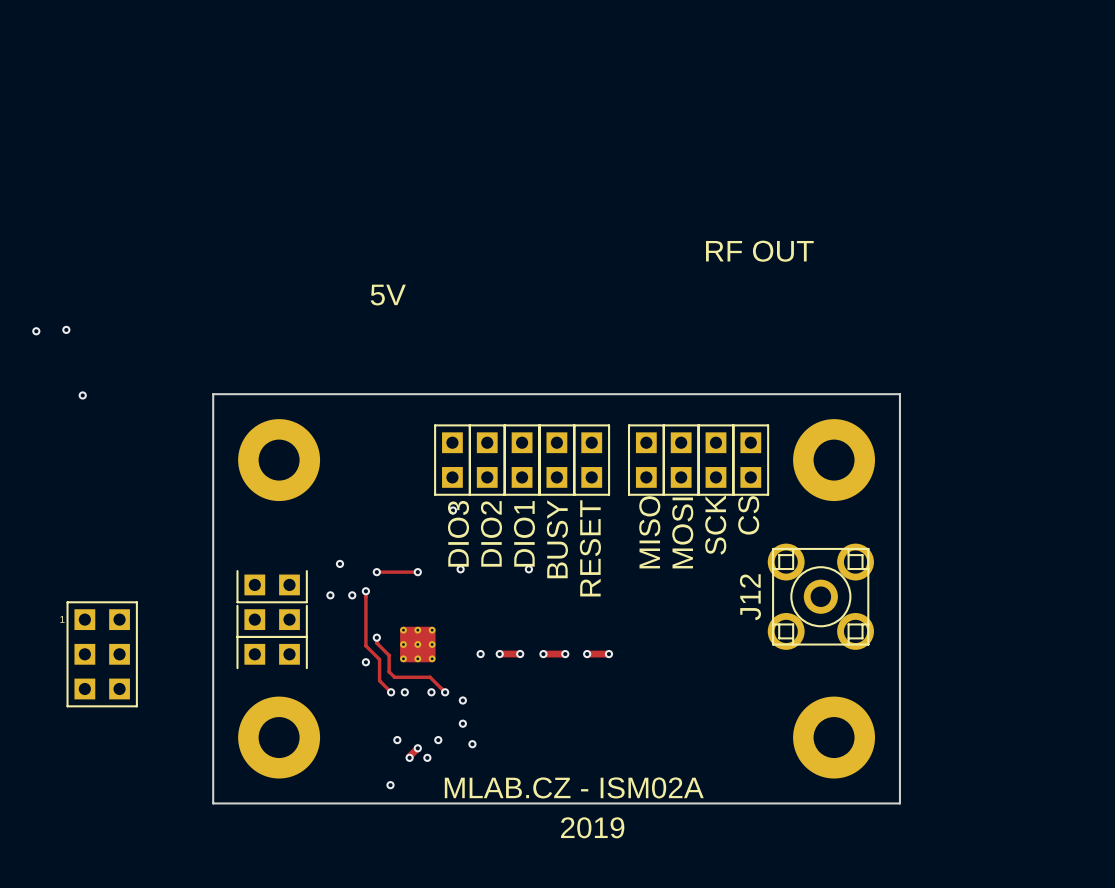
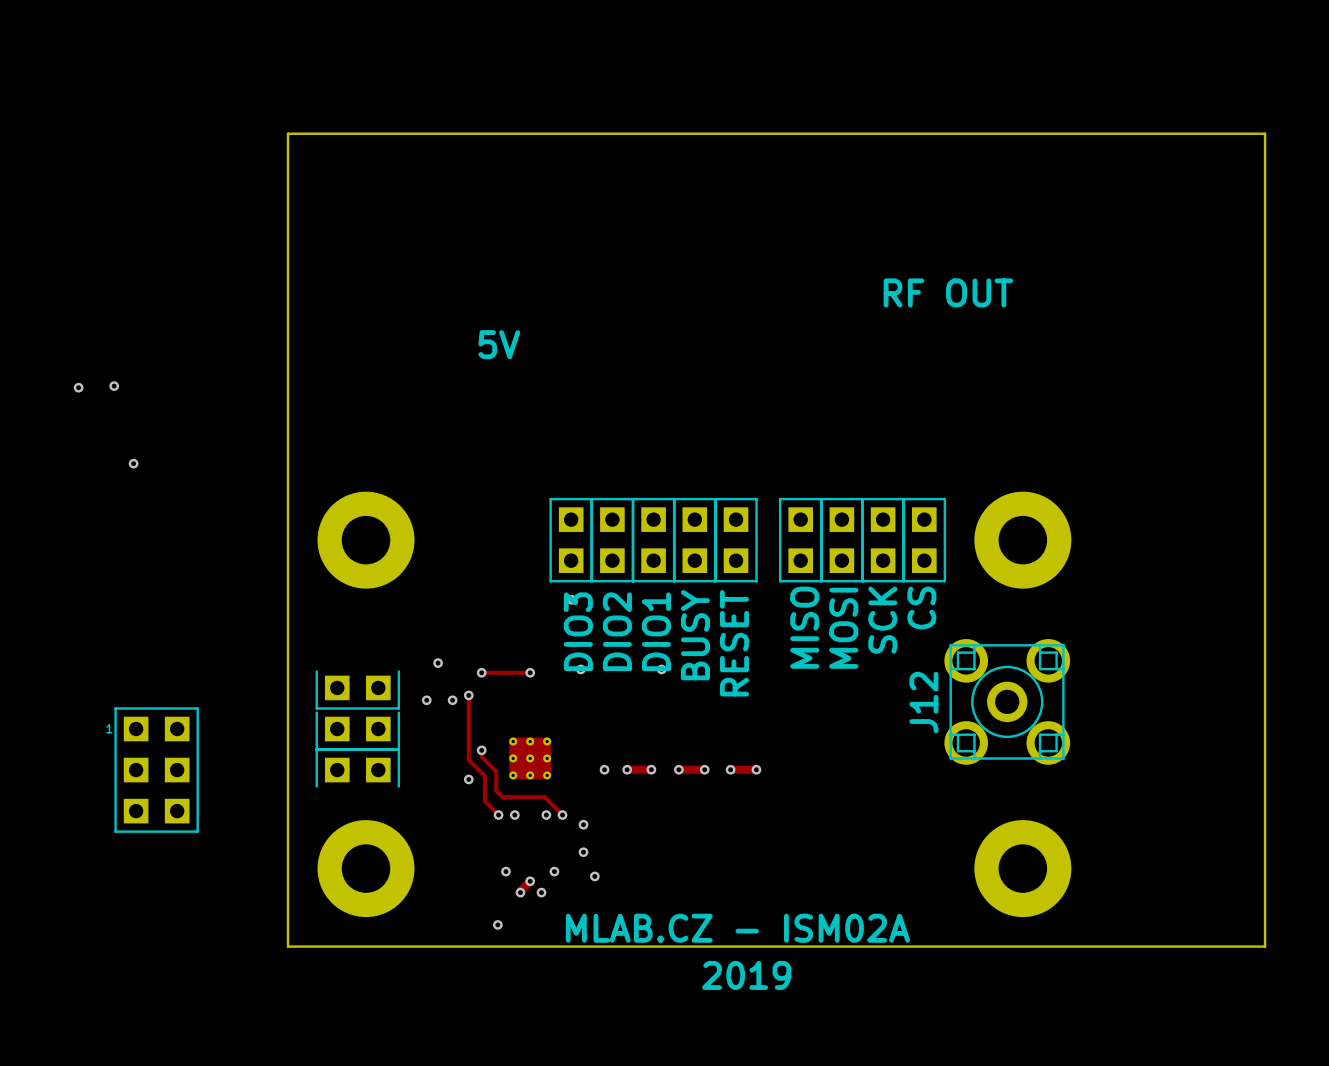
board edge: (213, 394) (899, 394) (899, 803) -> (288, 462) (288, 133) (1265, 133) (1265, 946) (1100, 946)

